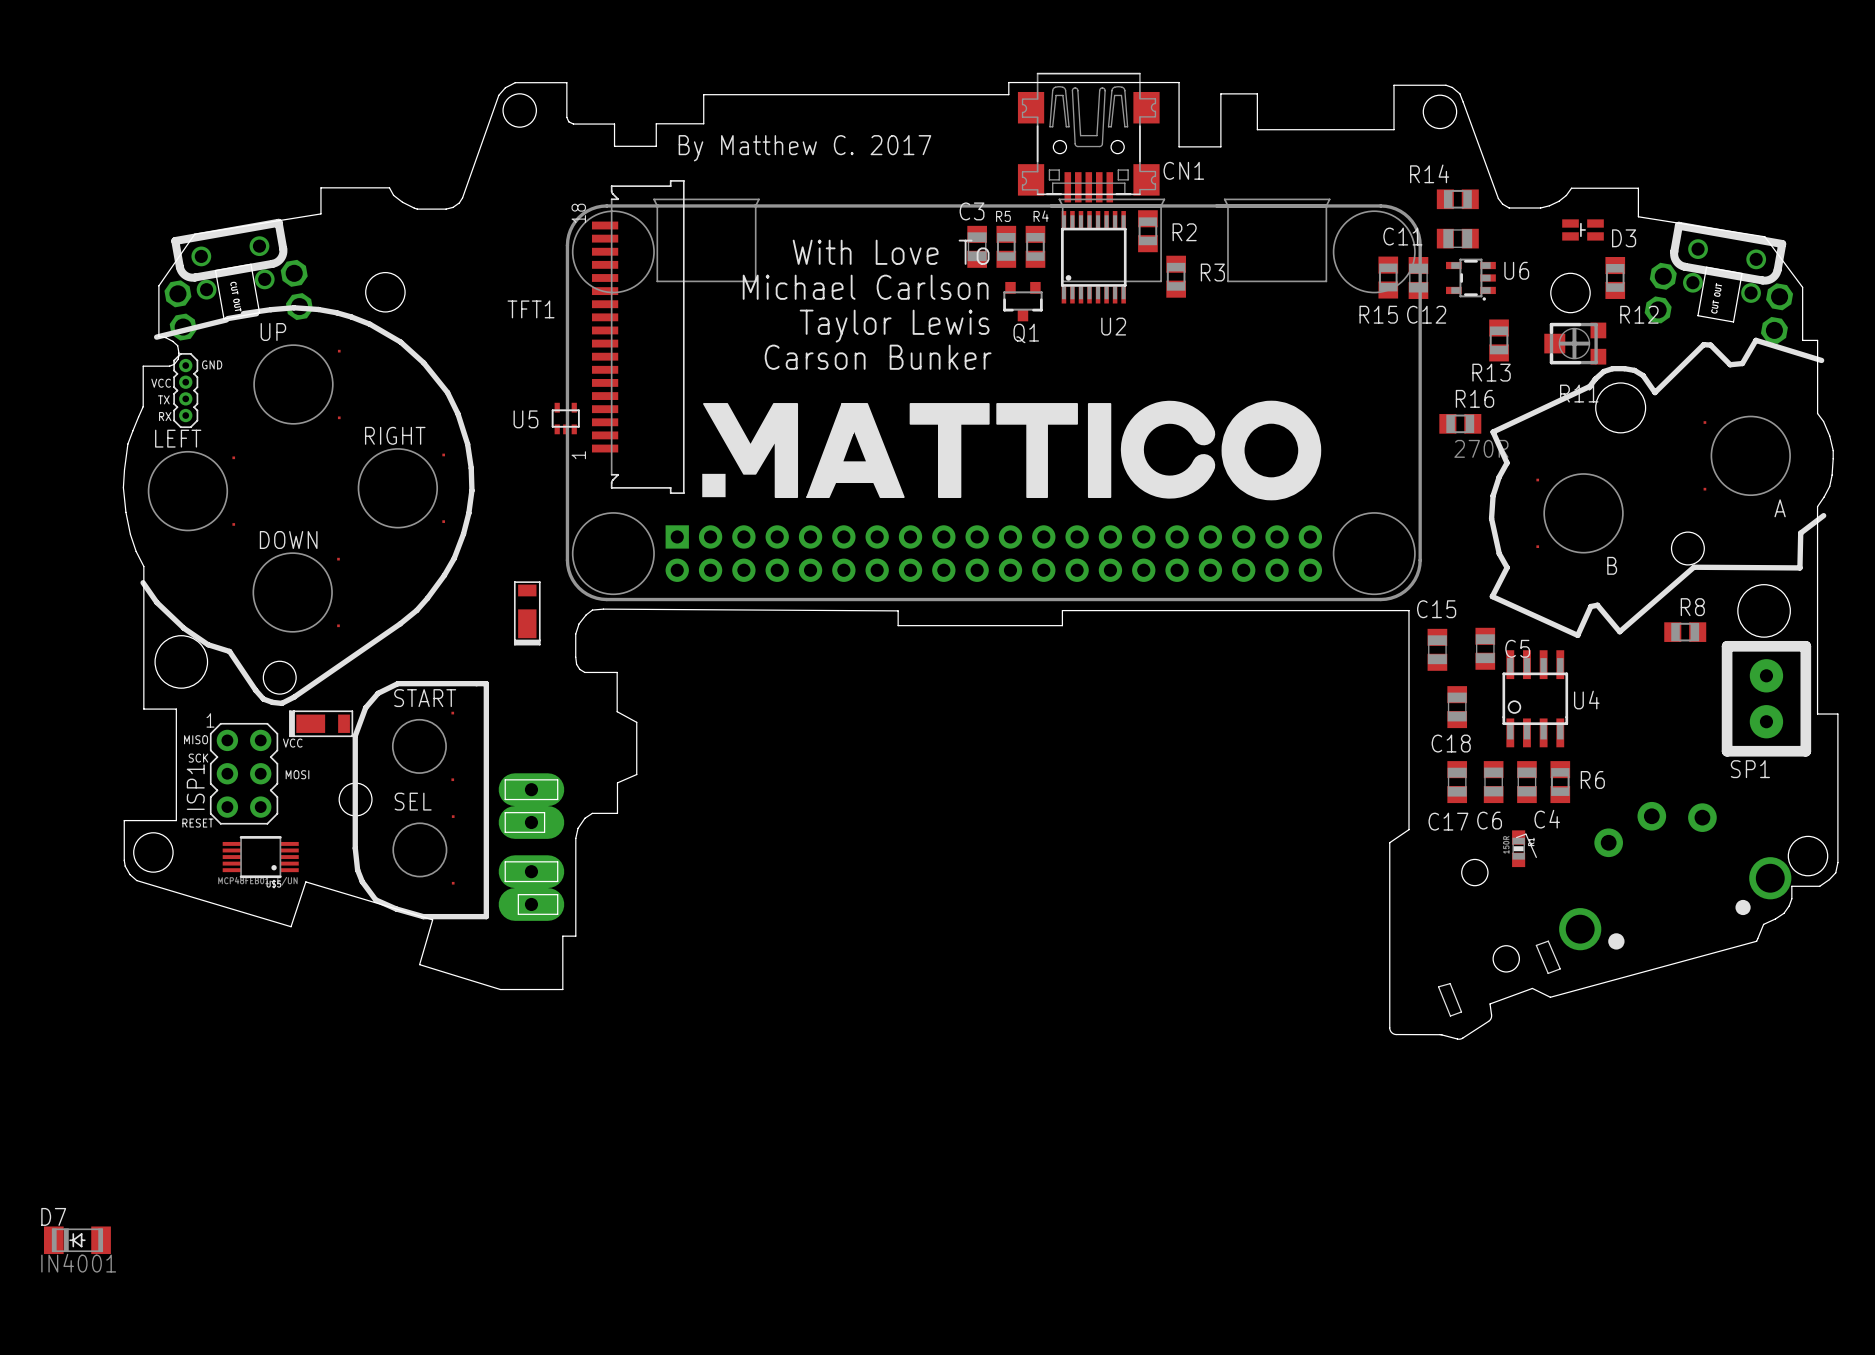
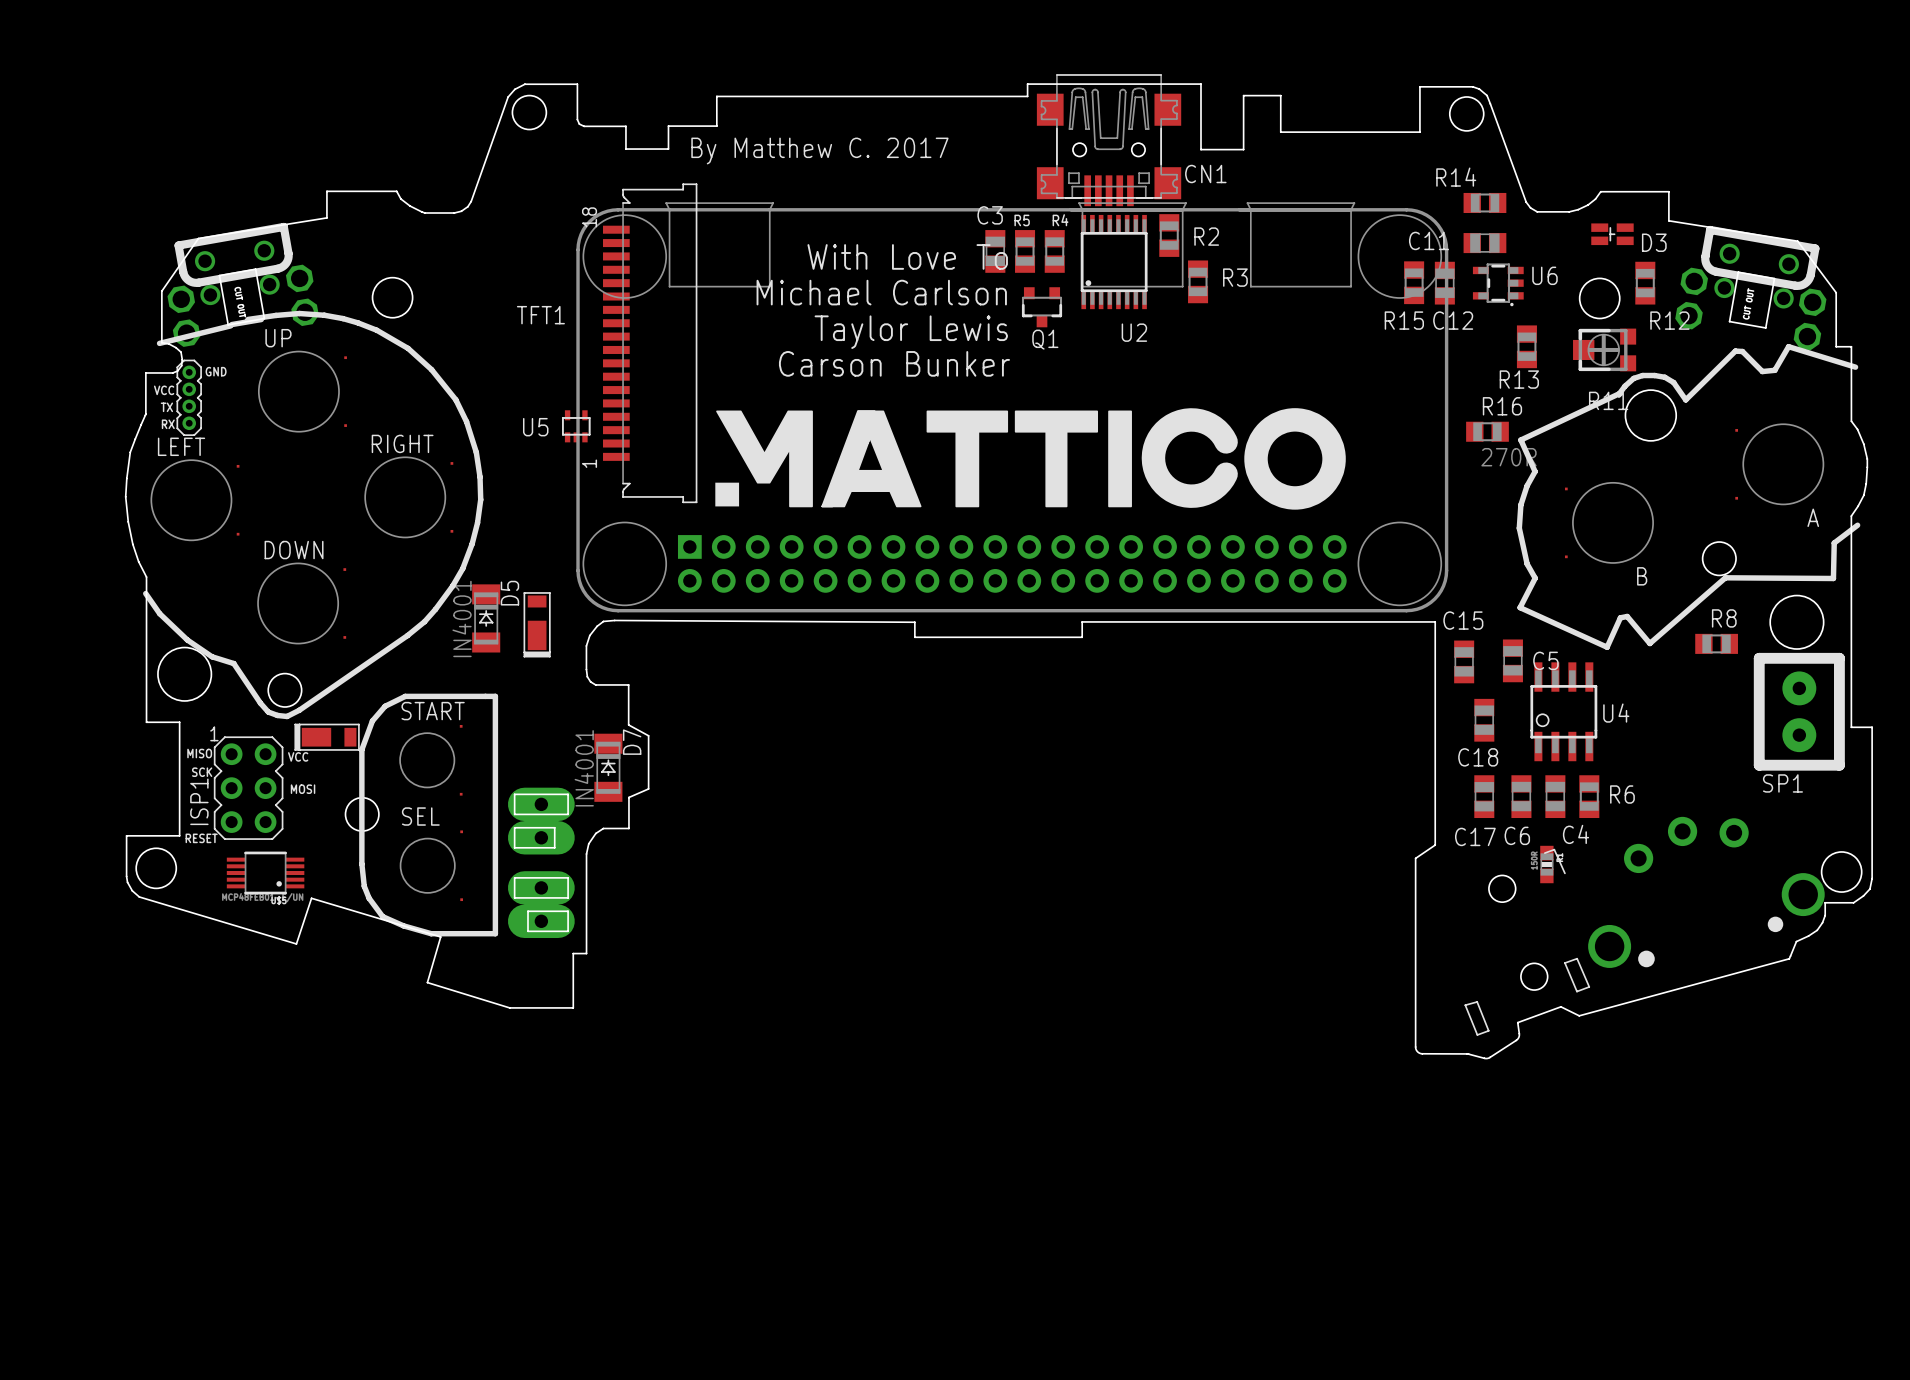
D5: none -> IN4001 (486, 618)
D7 rotation: 0° (77, 1240) -> 90° clockwise (608, 767)
D7 position: (77, 1240) -> (608, 767)

